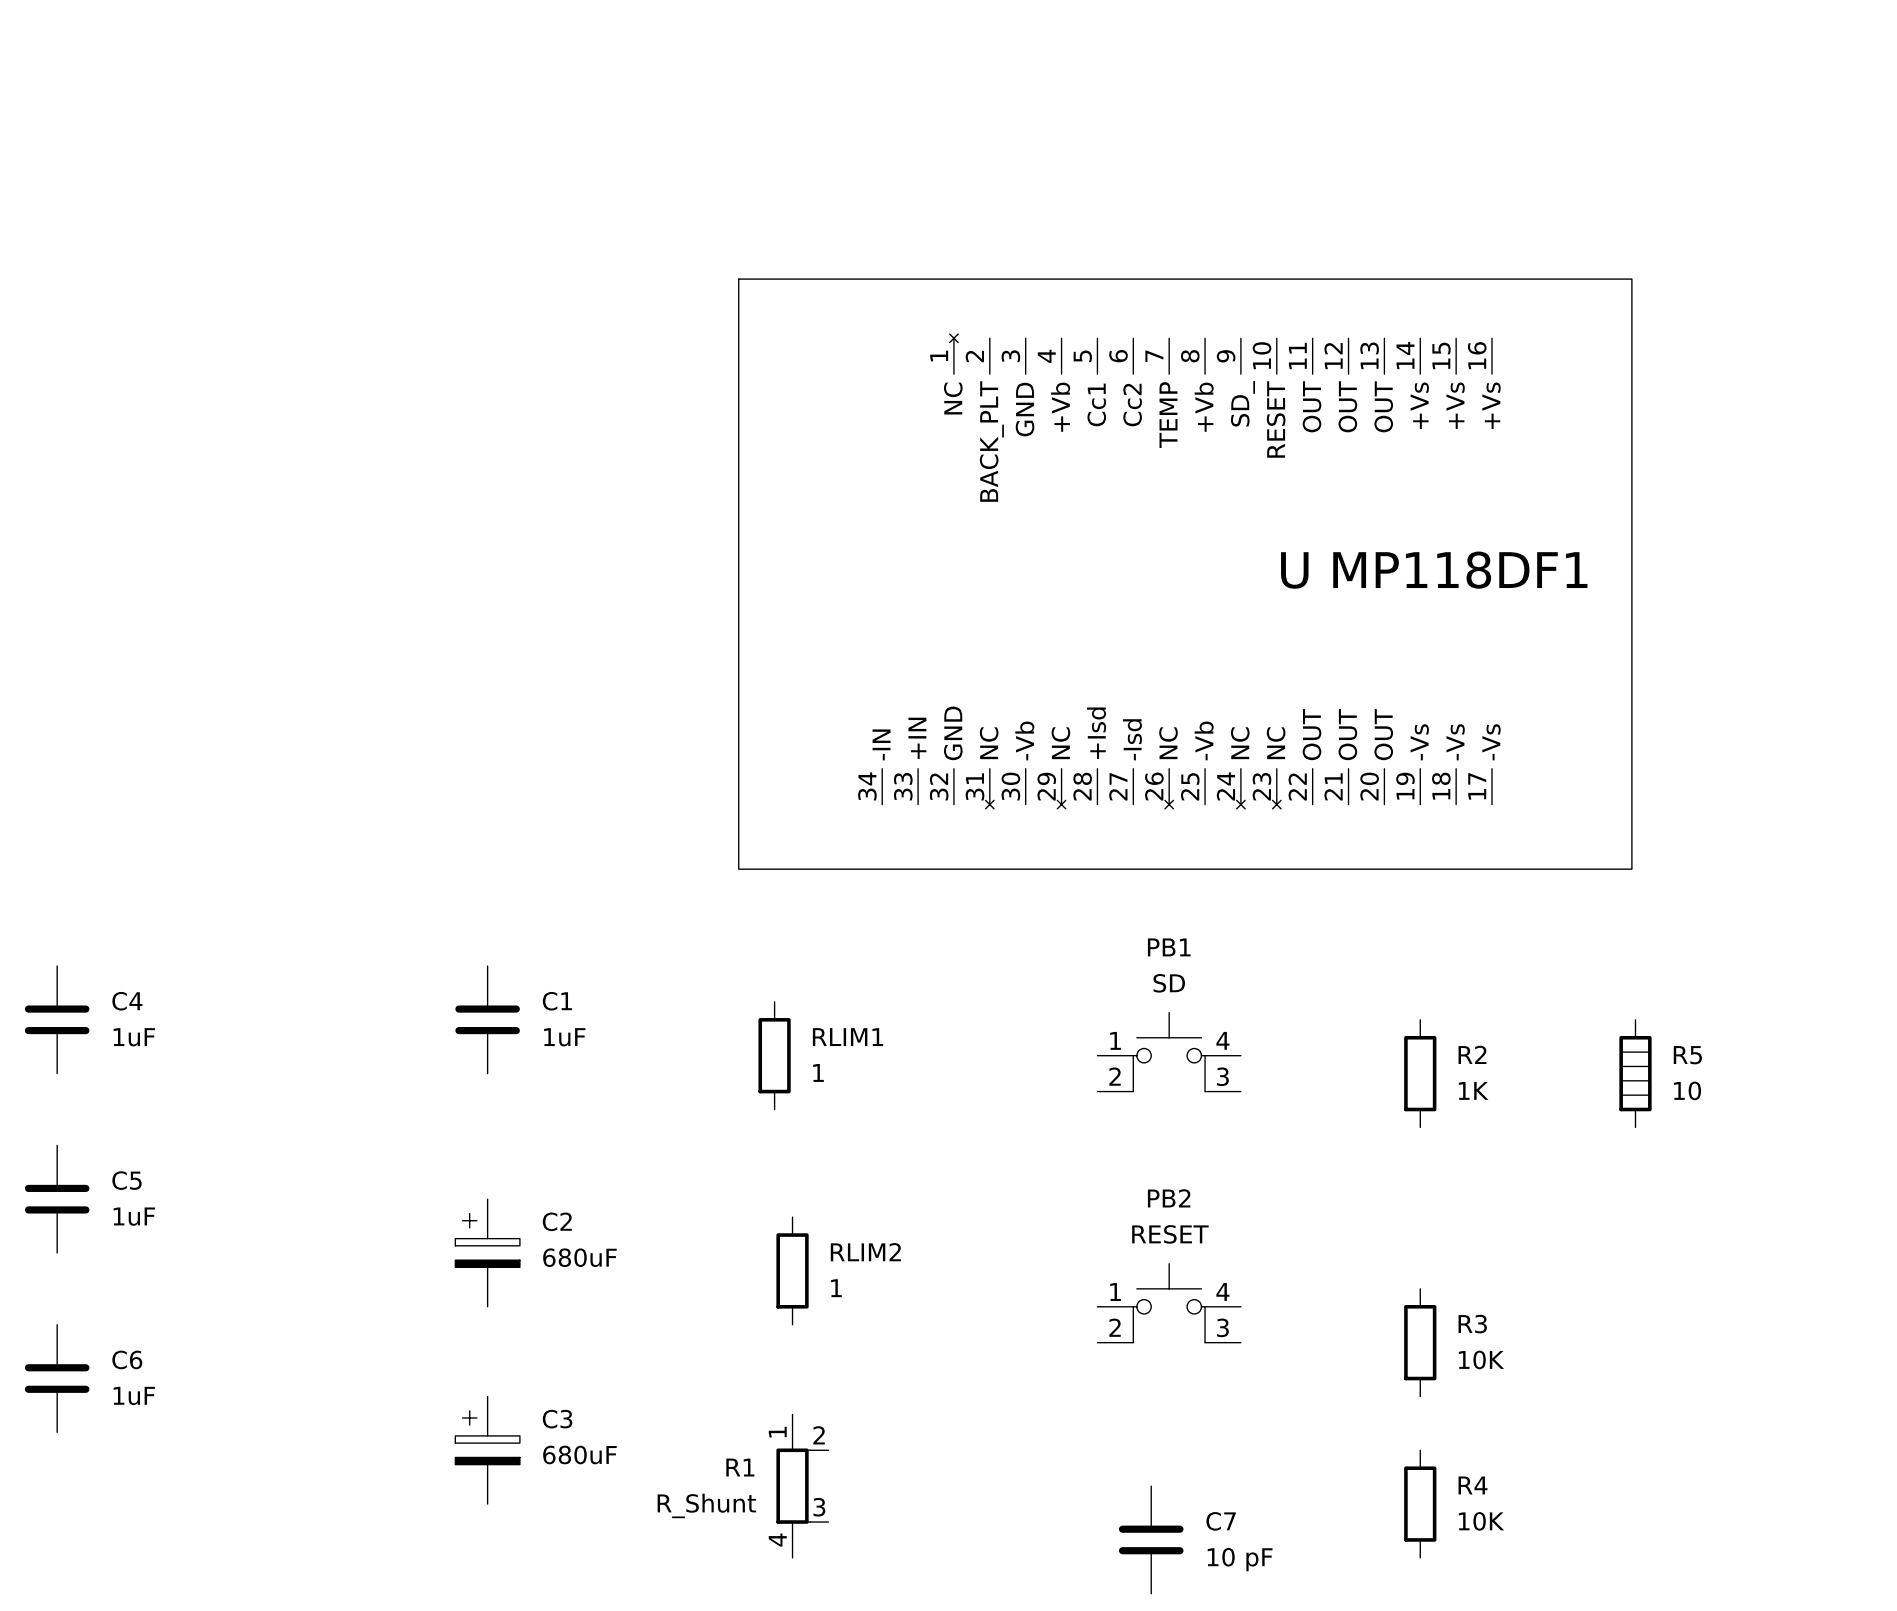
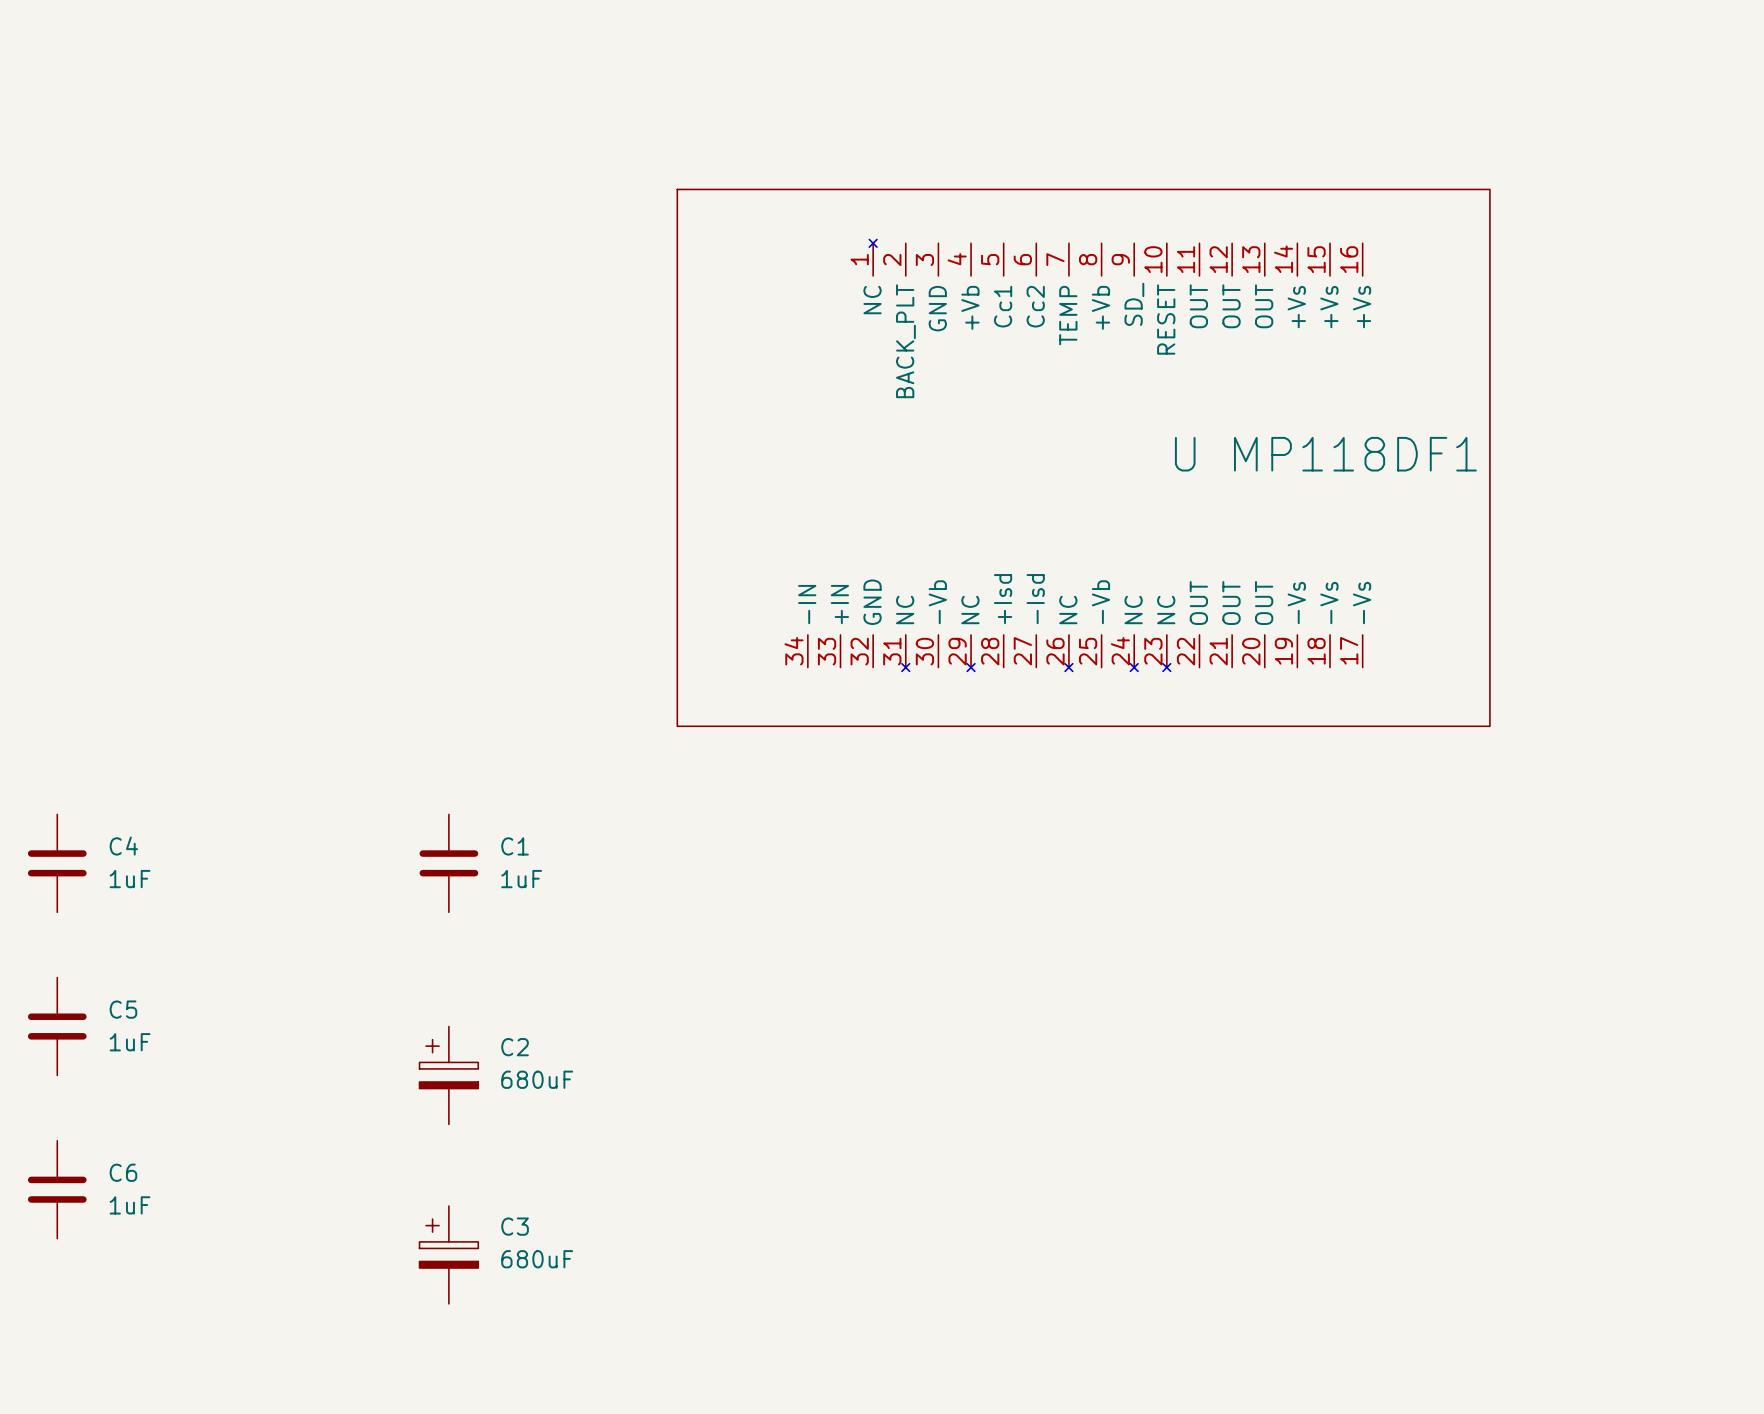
PB1: SD (1169, 1052) -> none
RLIM1: 1 (774, 1055) -> none
R2: 1K (1420, 1073) -> none
R5: 10 (1635, 1073) -> none
RLIM2: 1 (792, 1270) -> none
PB2: RESET (1169, 1303) -> none
R3: 10K (1420, 1342) -> none
R1: R_Shunt (802, 1486) -> none
R4: 10K (1420, 1504) -> none
C7: 10 pF (1151, 1539) -> none

